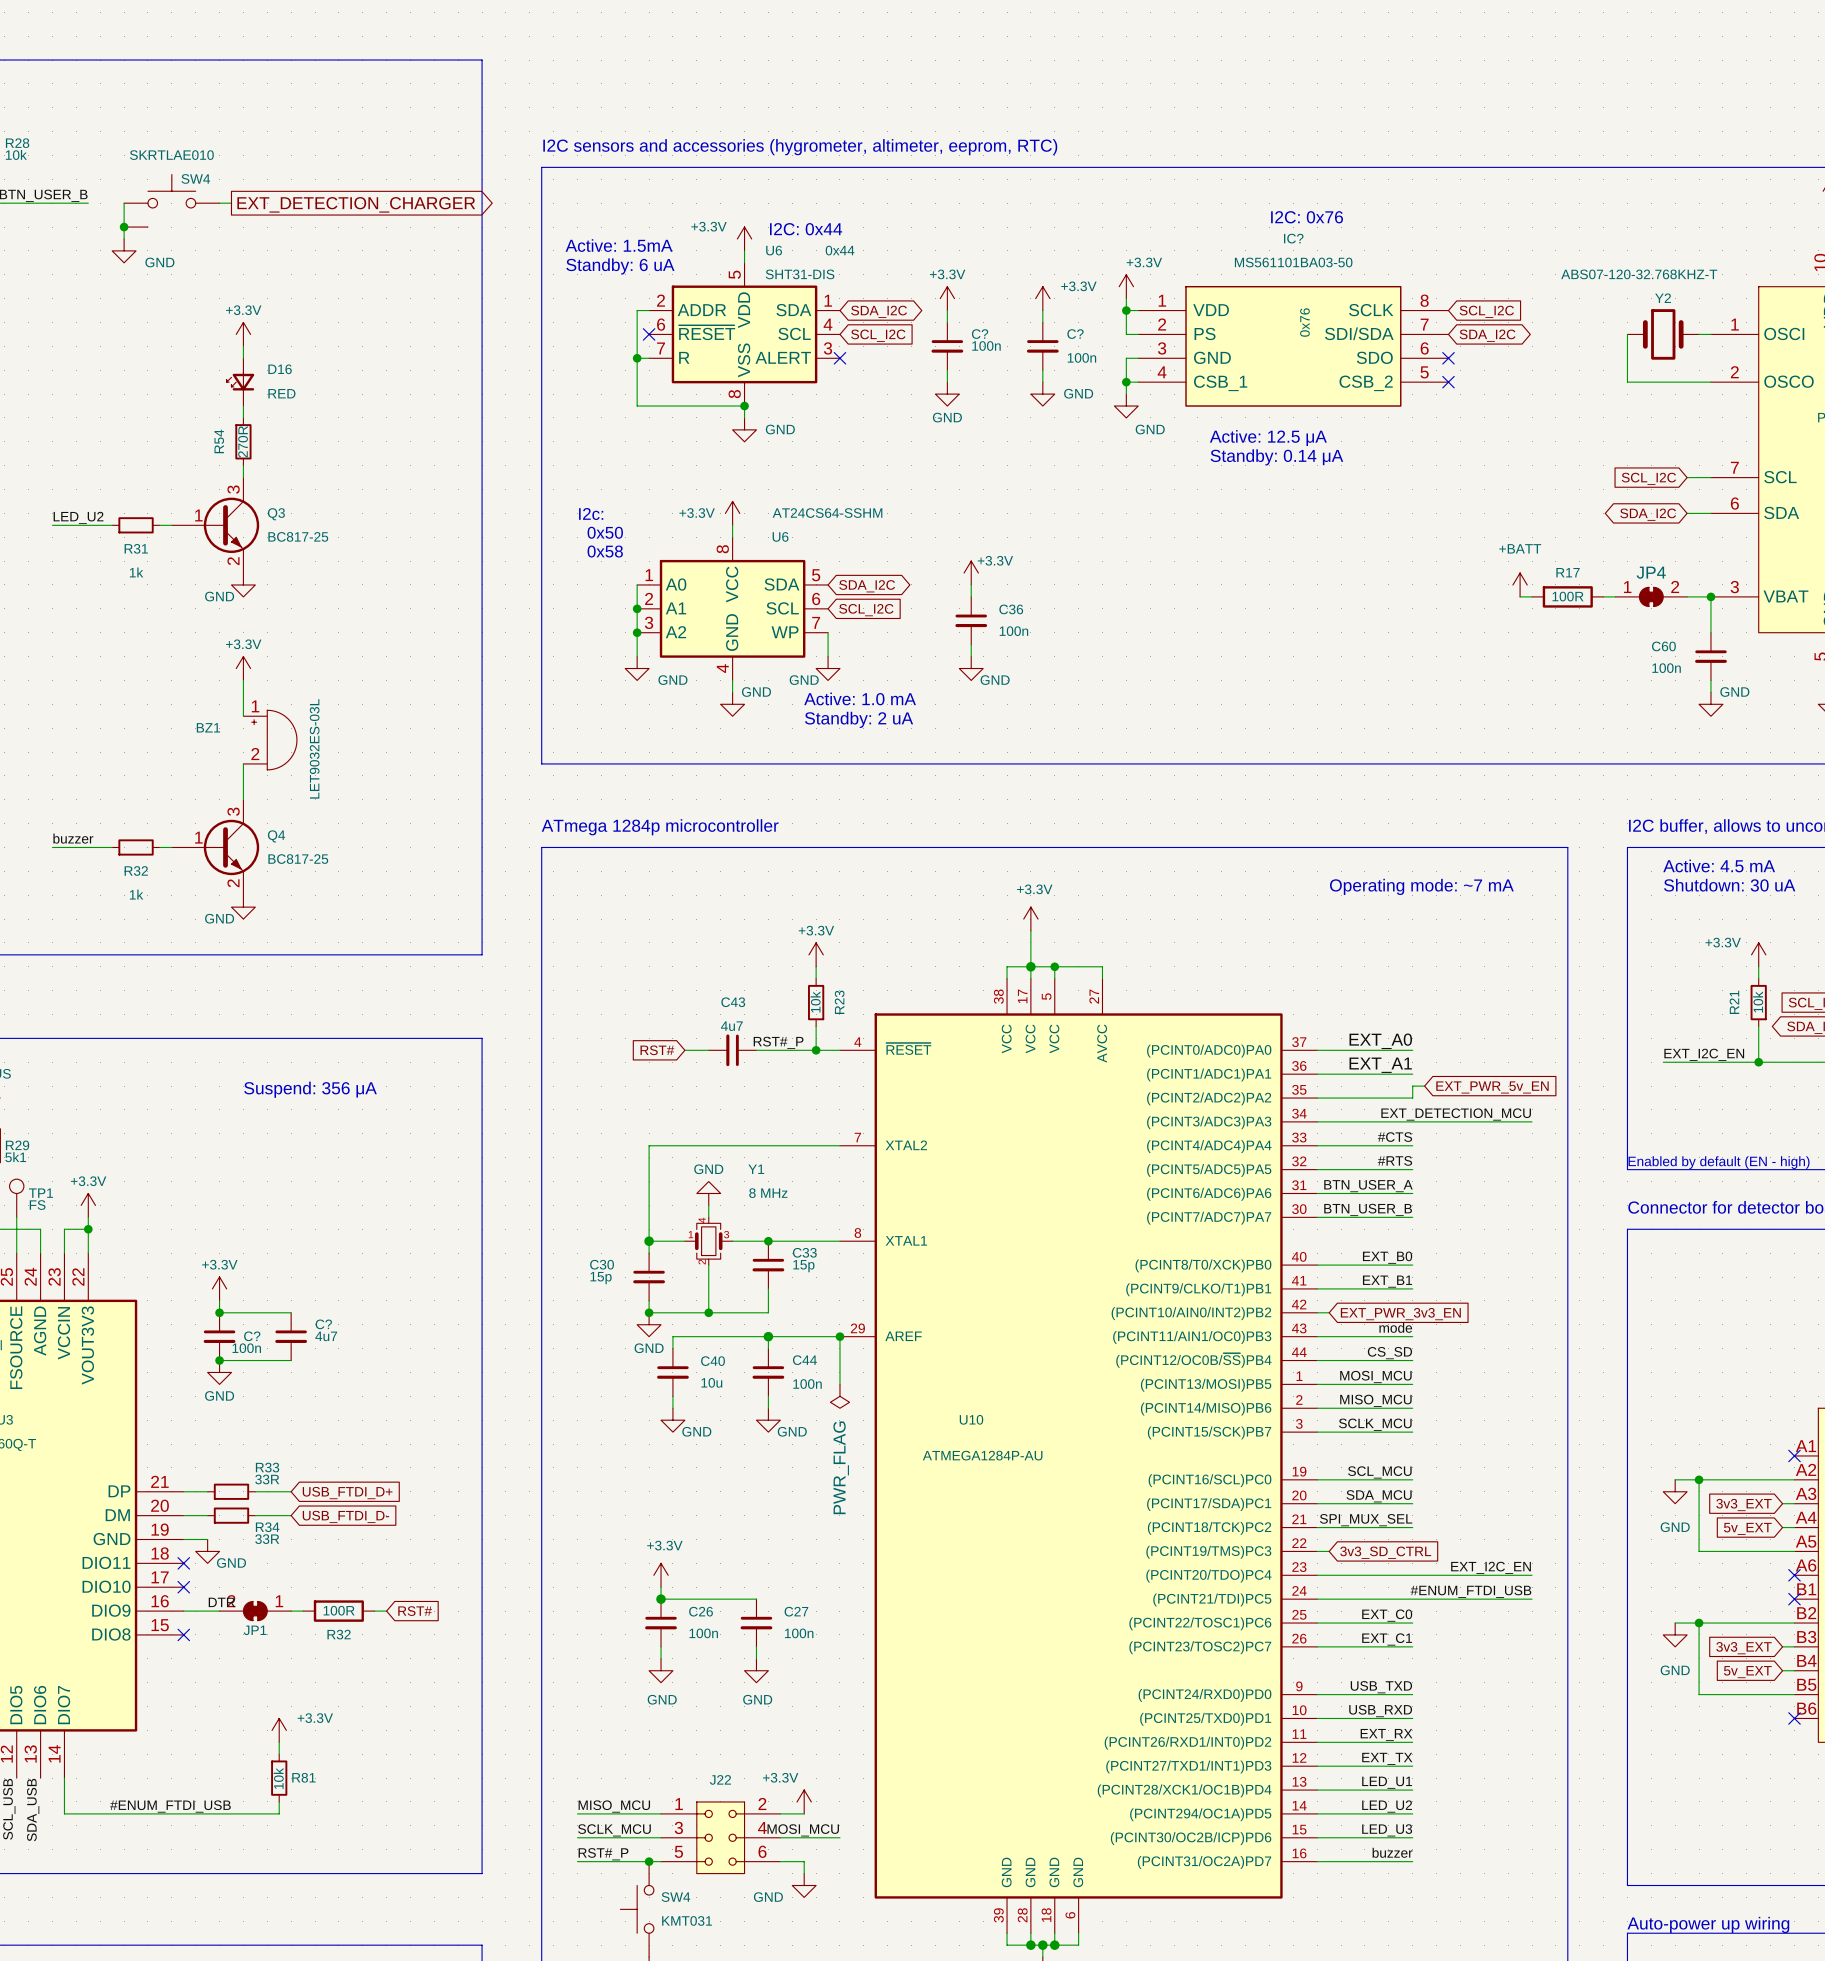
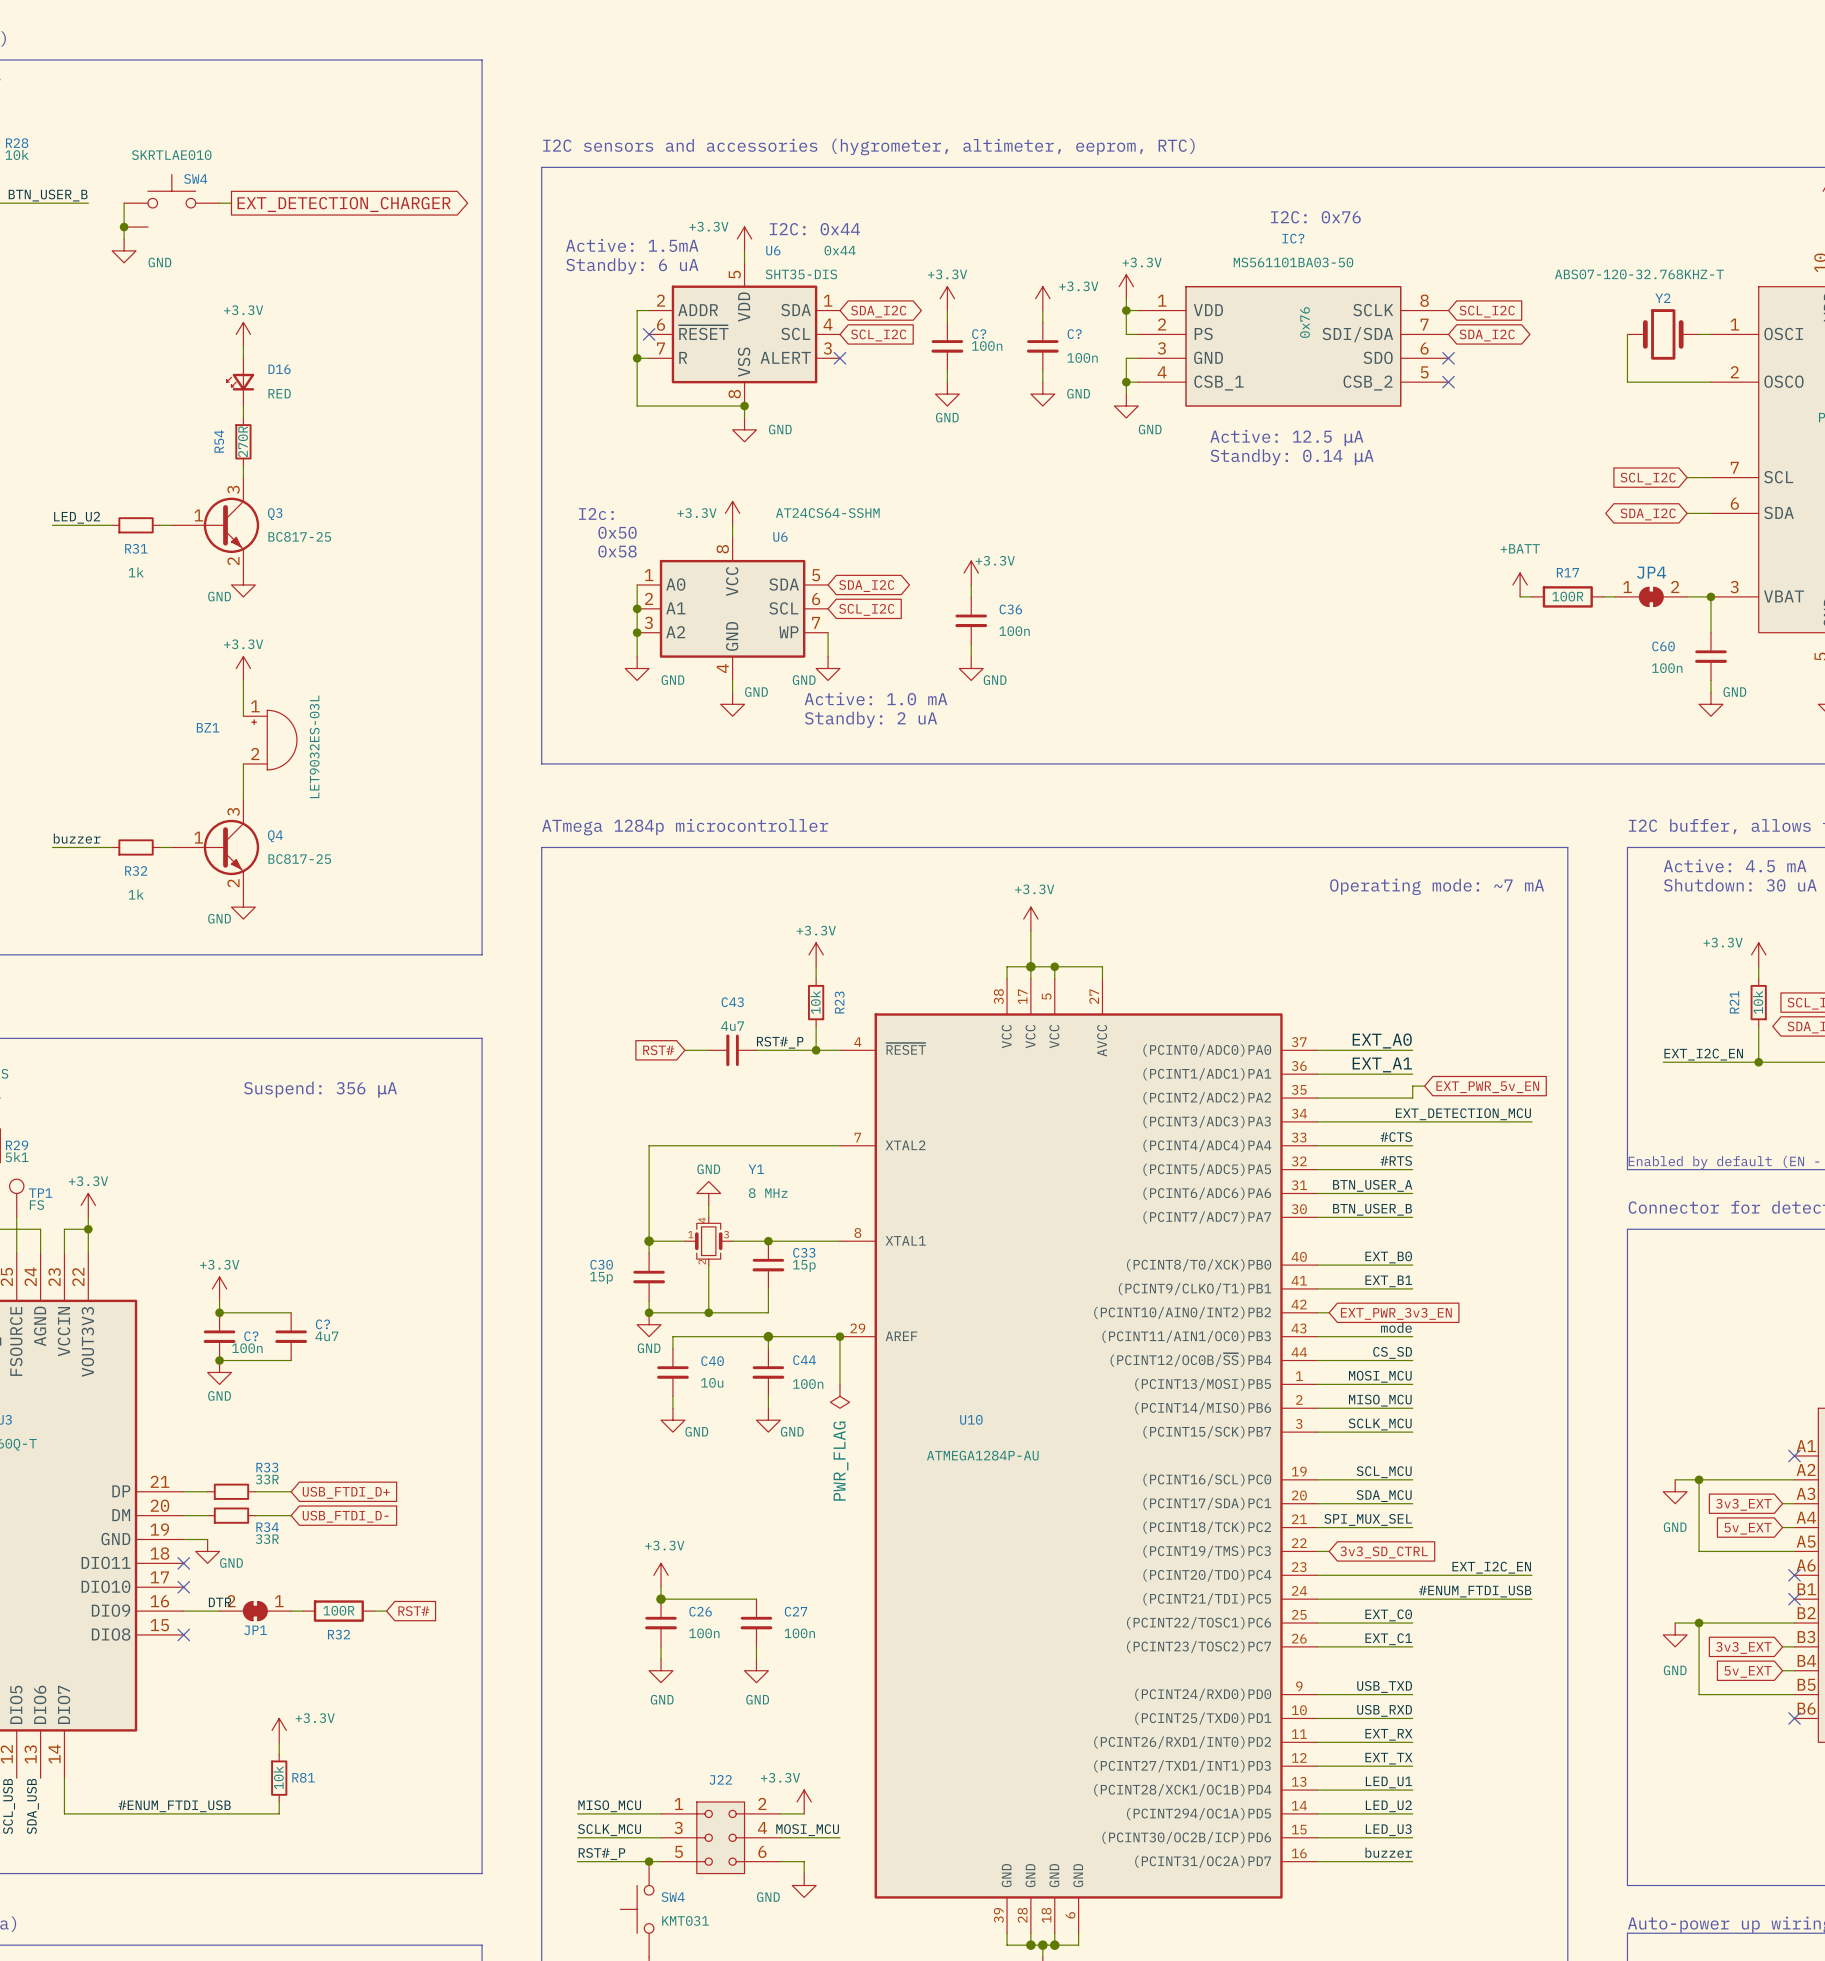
U6 value: SHT31-DIS (800, 274) -> SHT35-DIS (801, 274)

